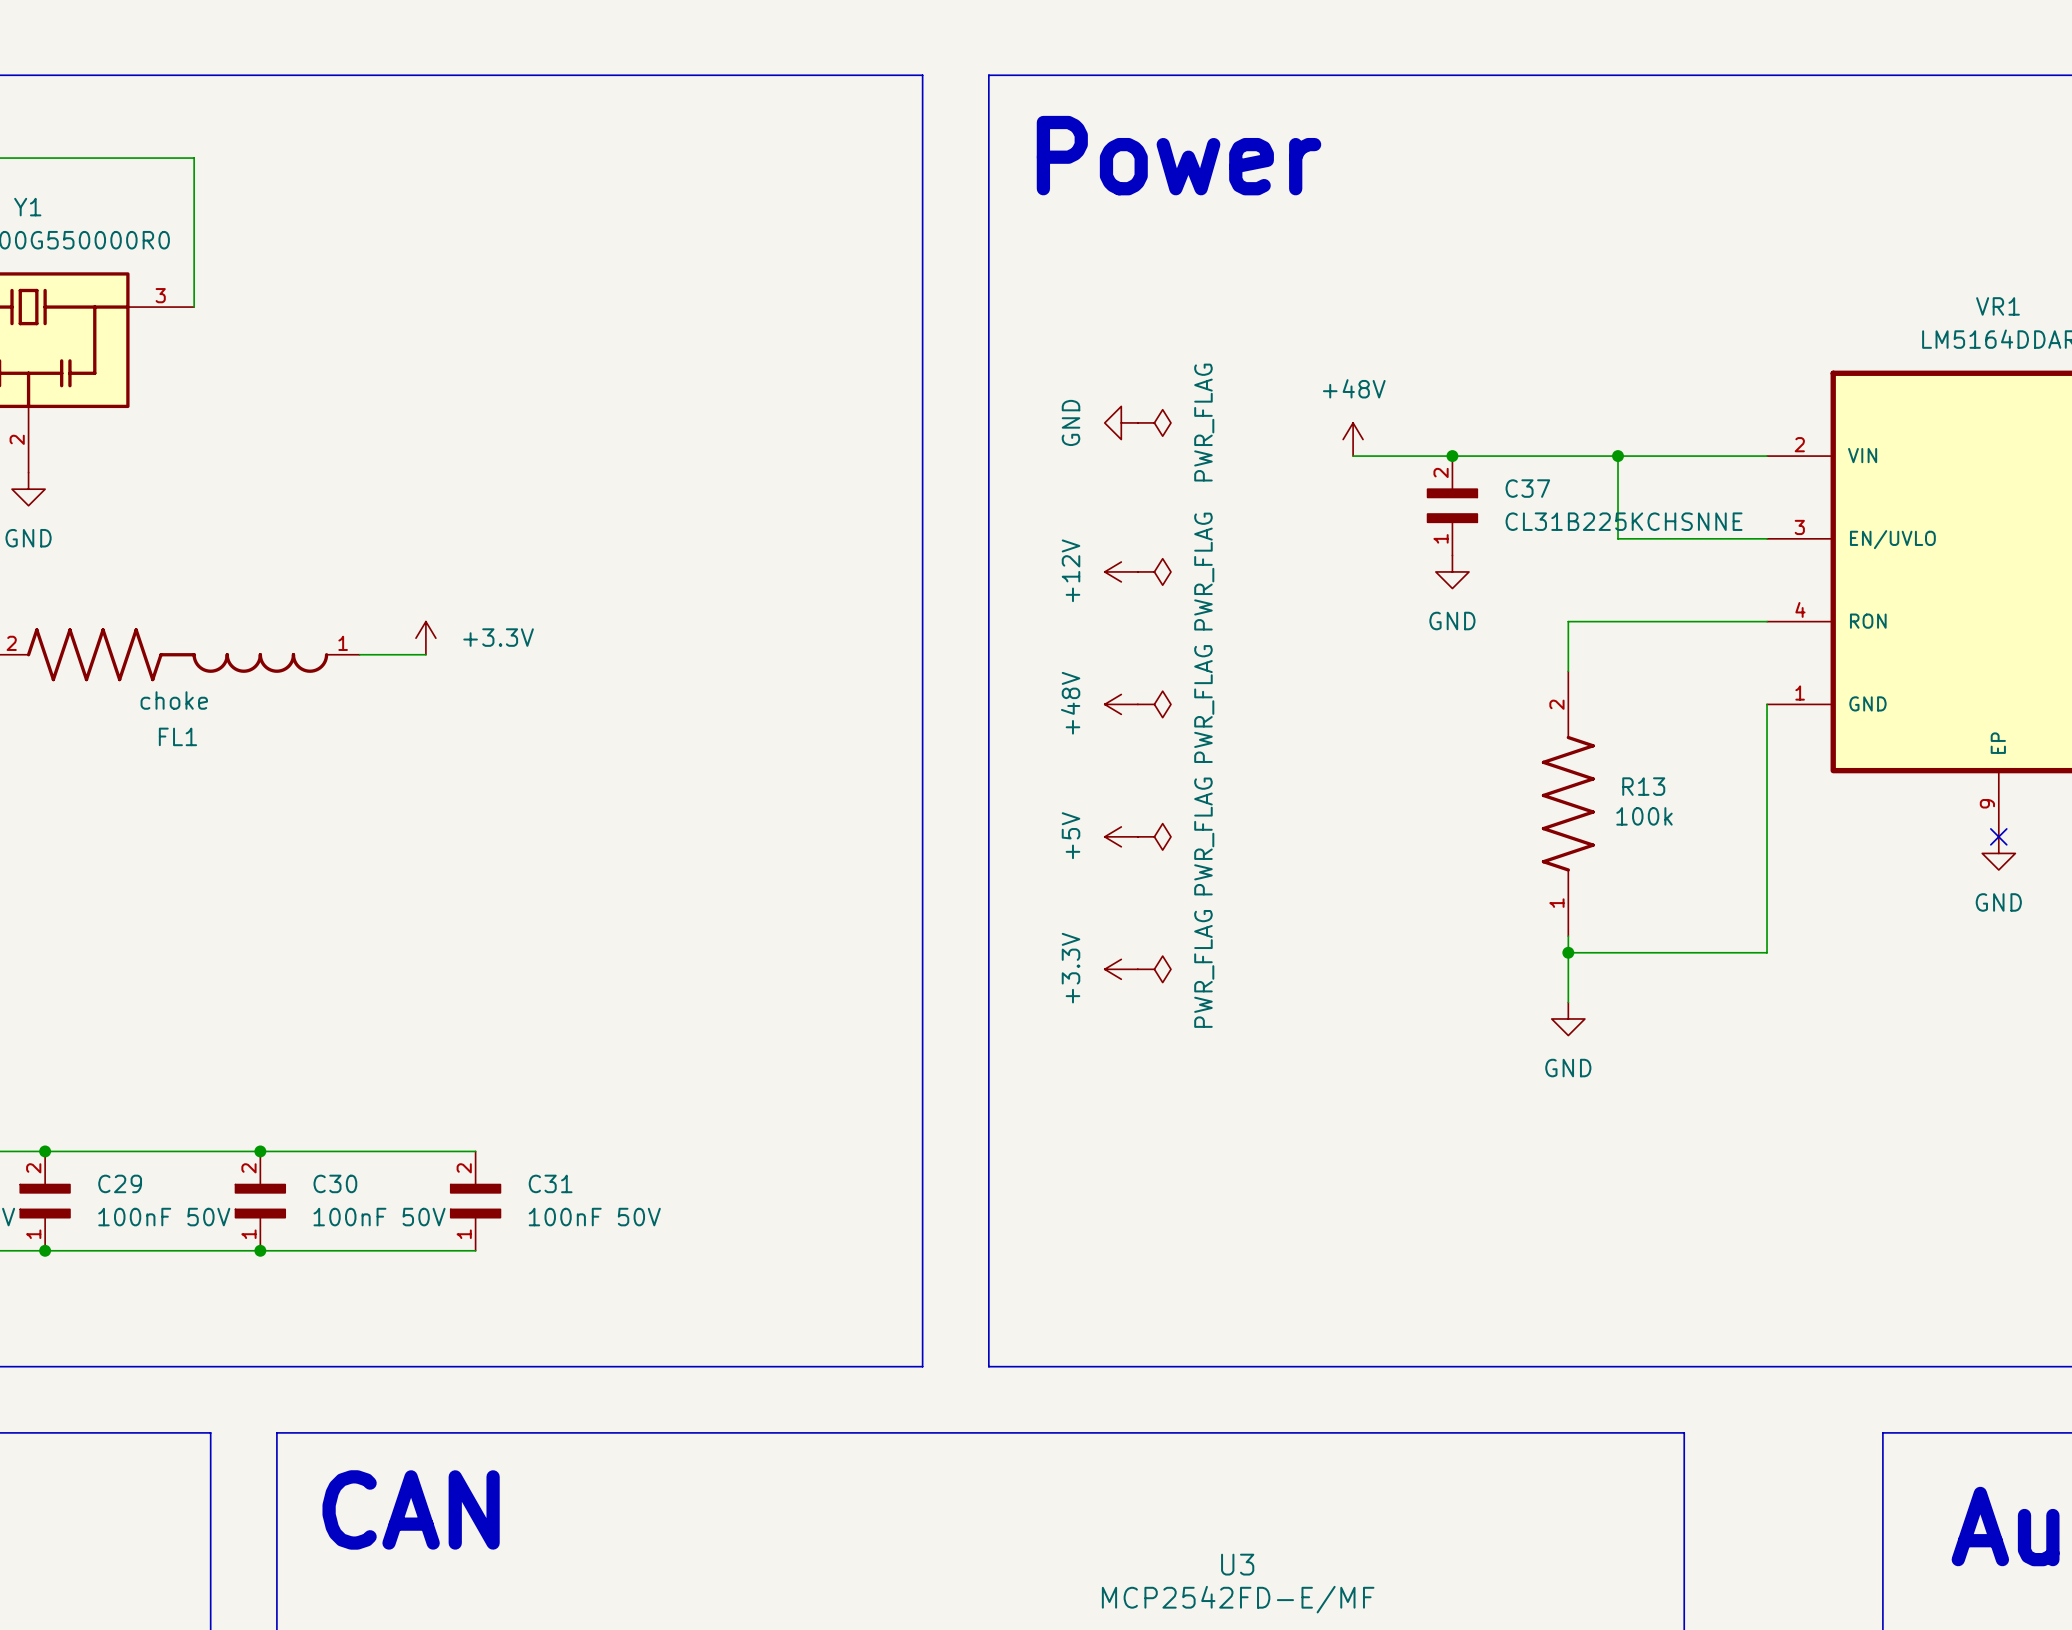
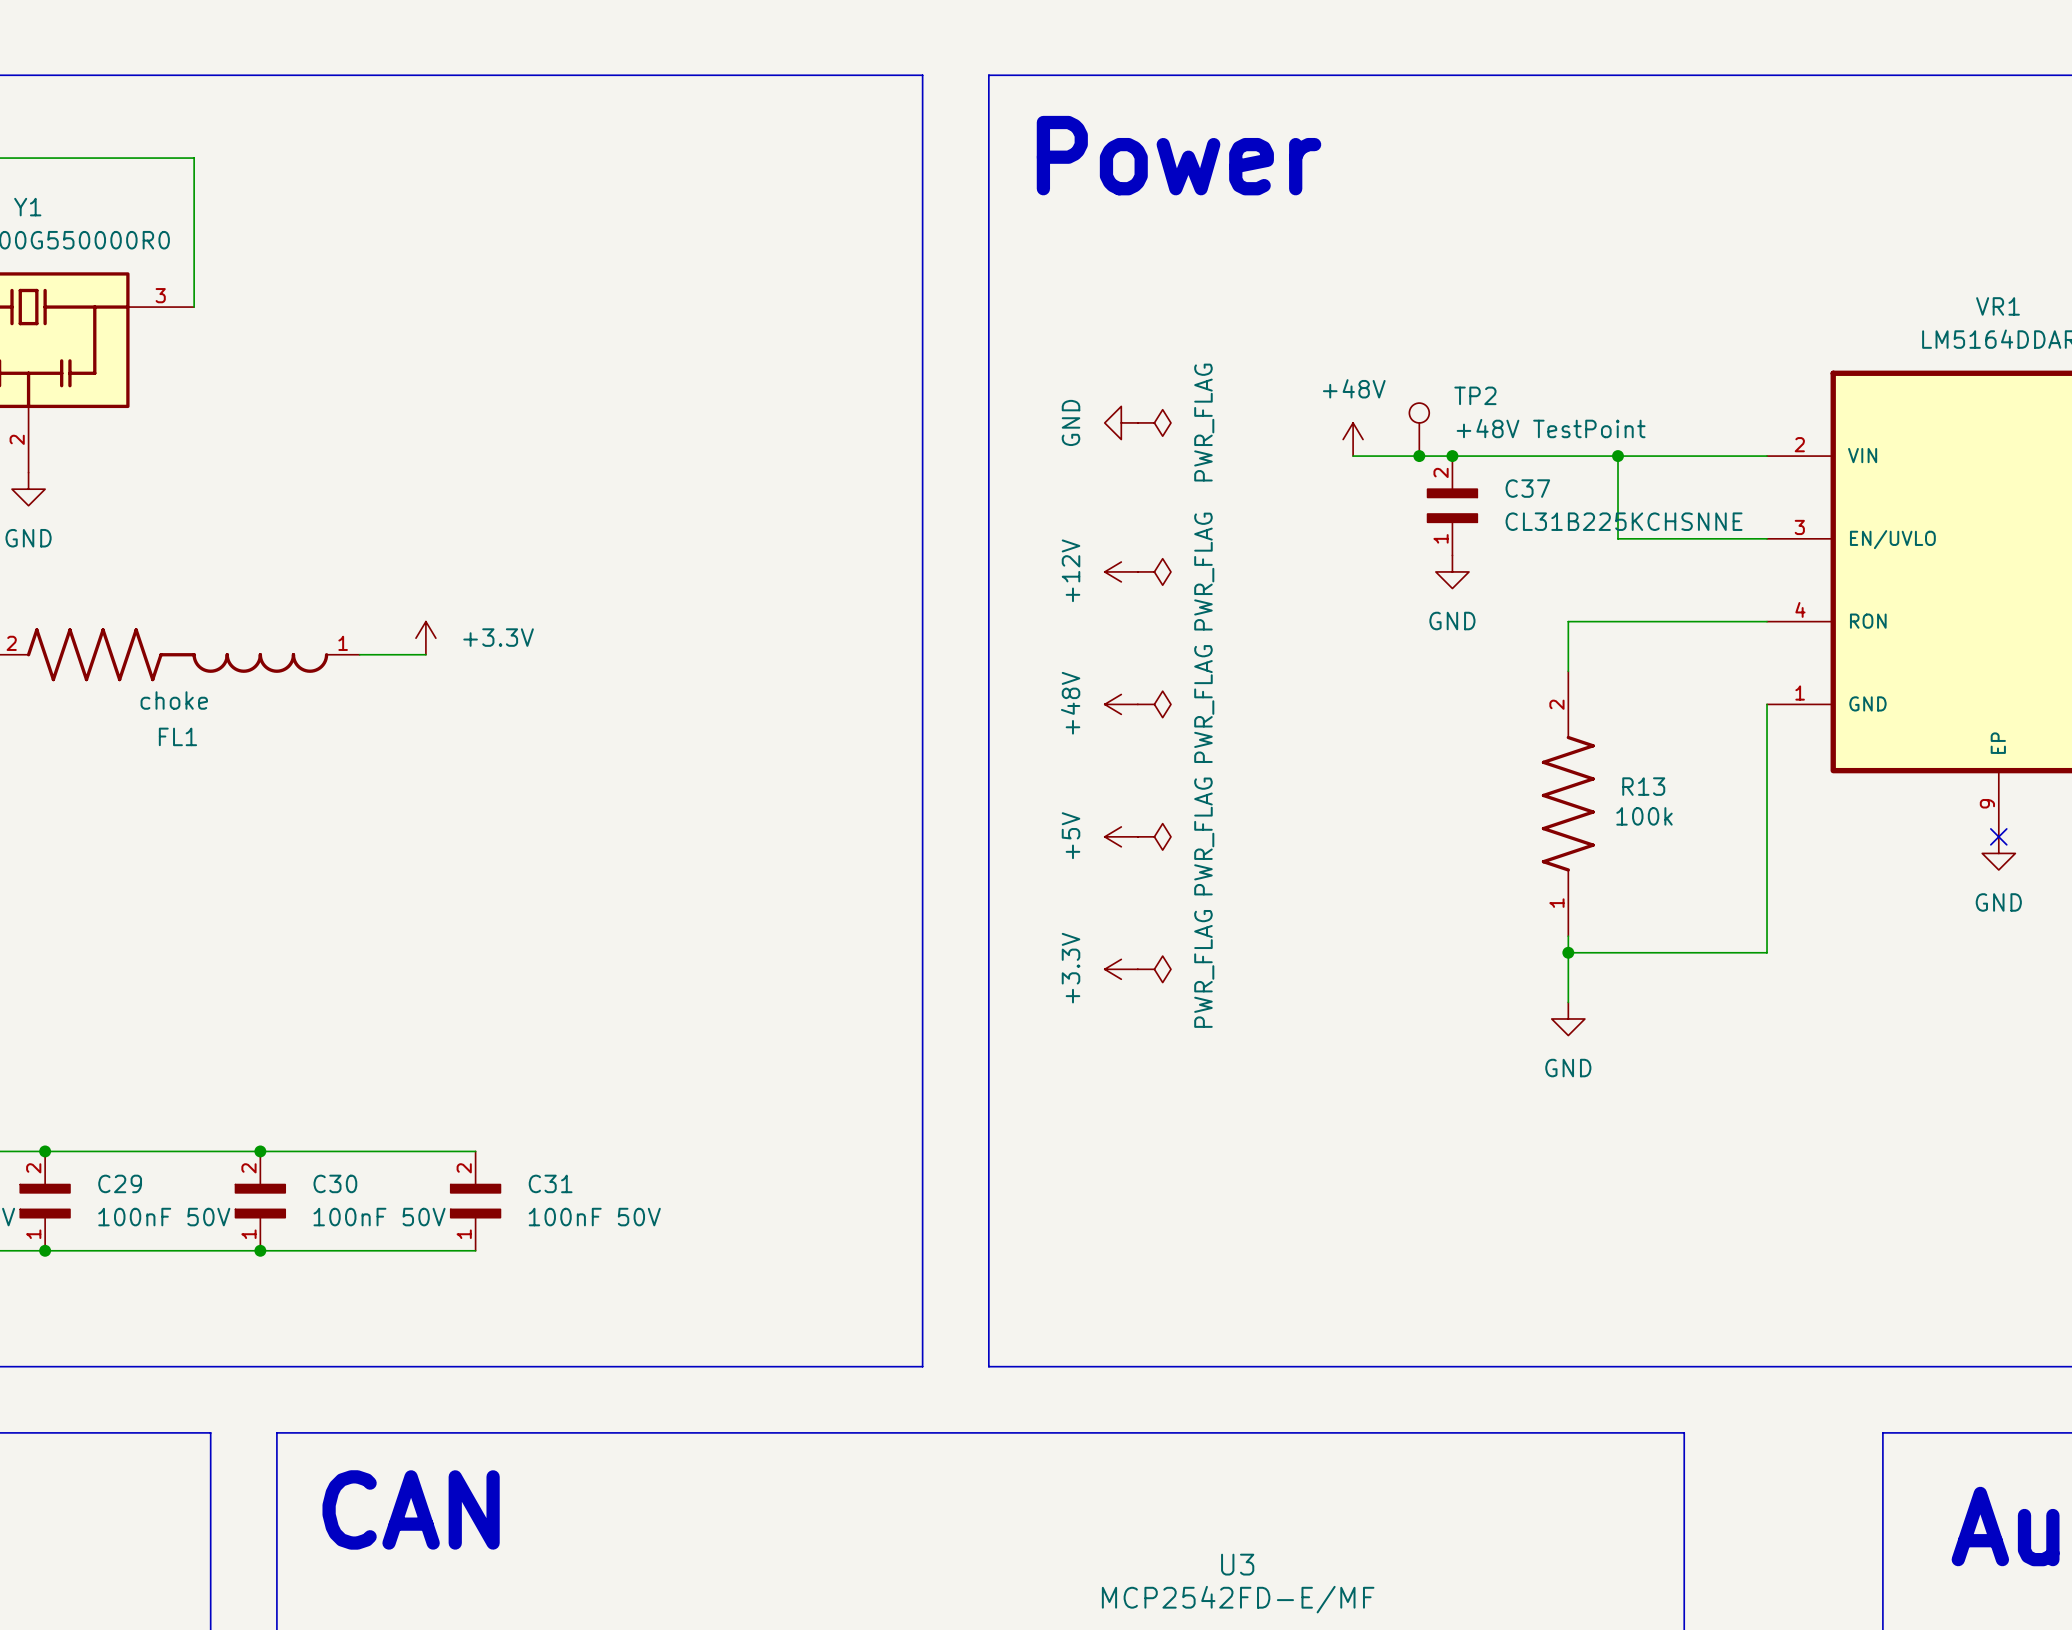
TP2: none -> +48V TestPoint (1419, 429)
junction: none -> (1419, 456)

